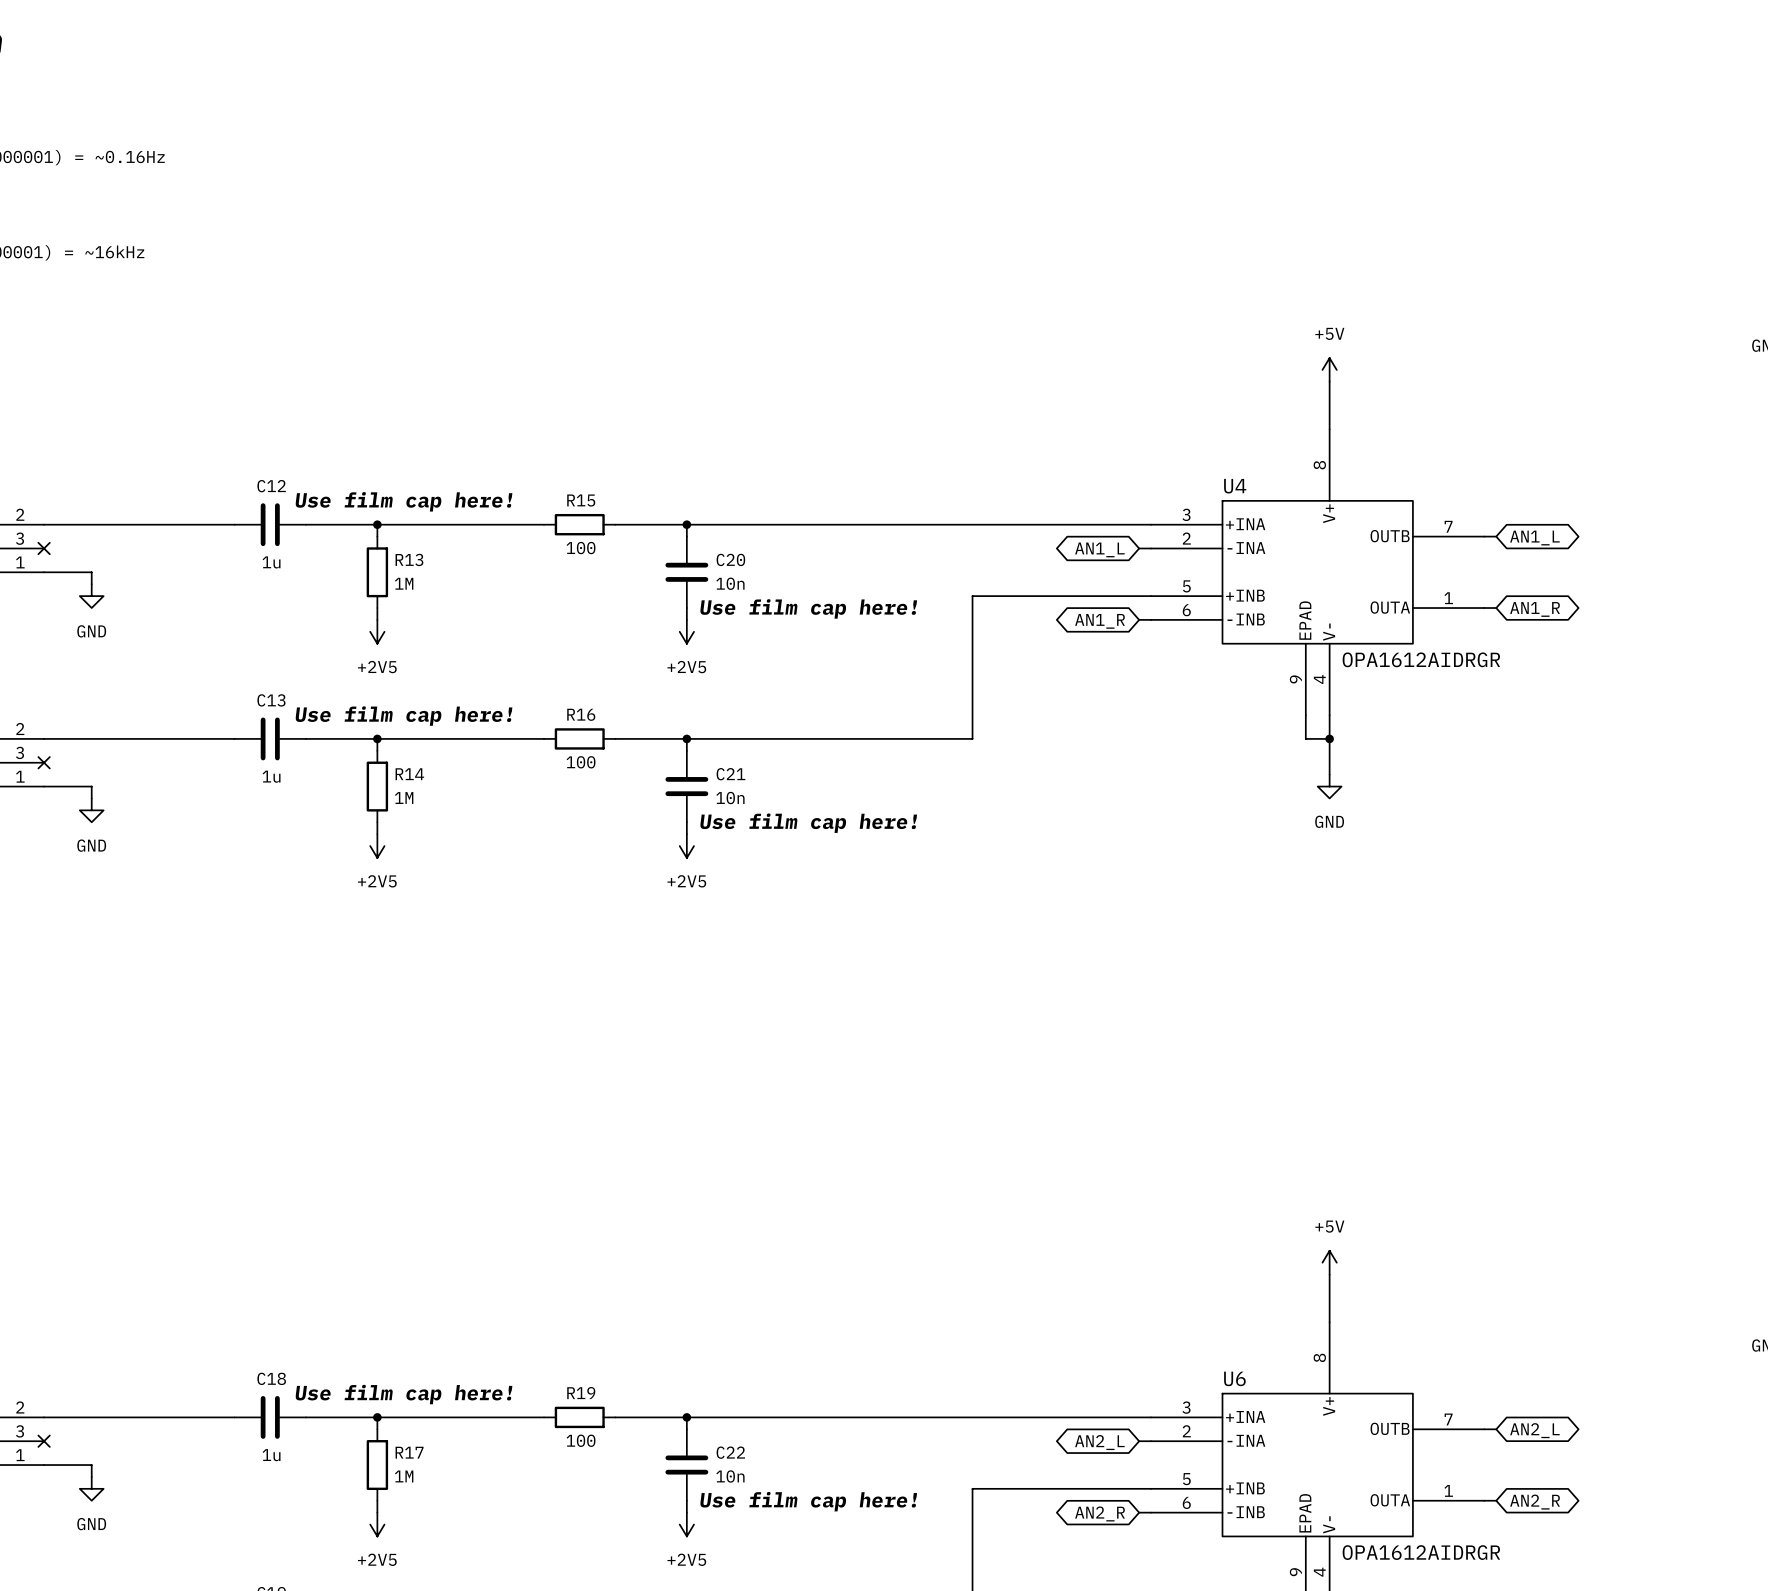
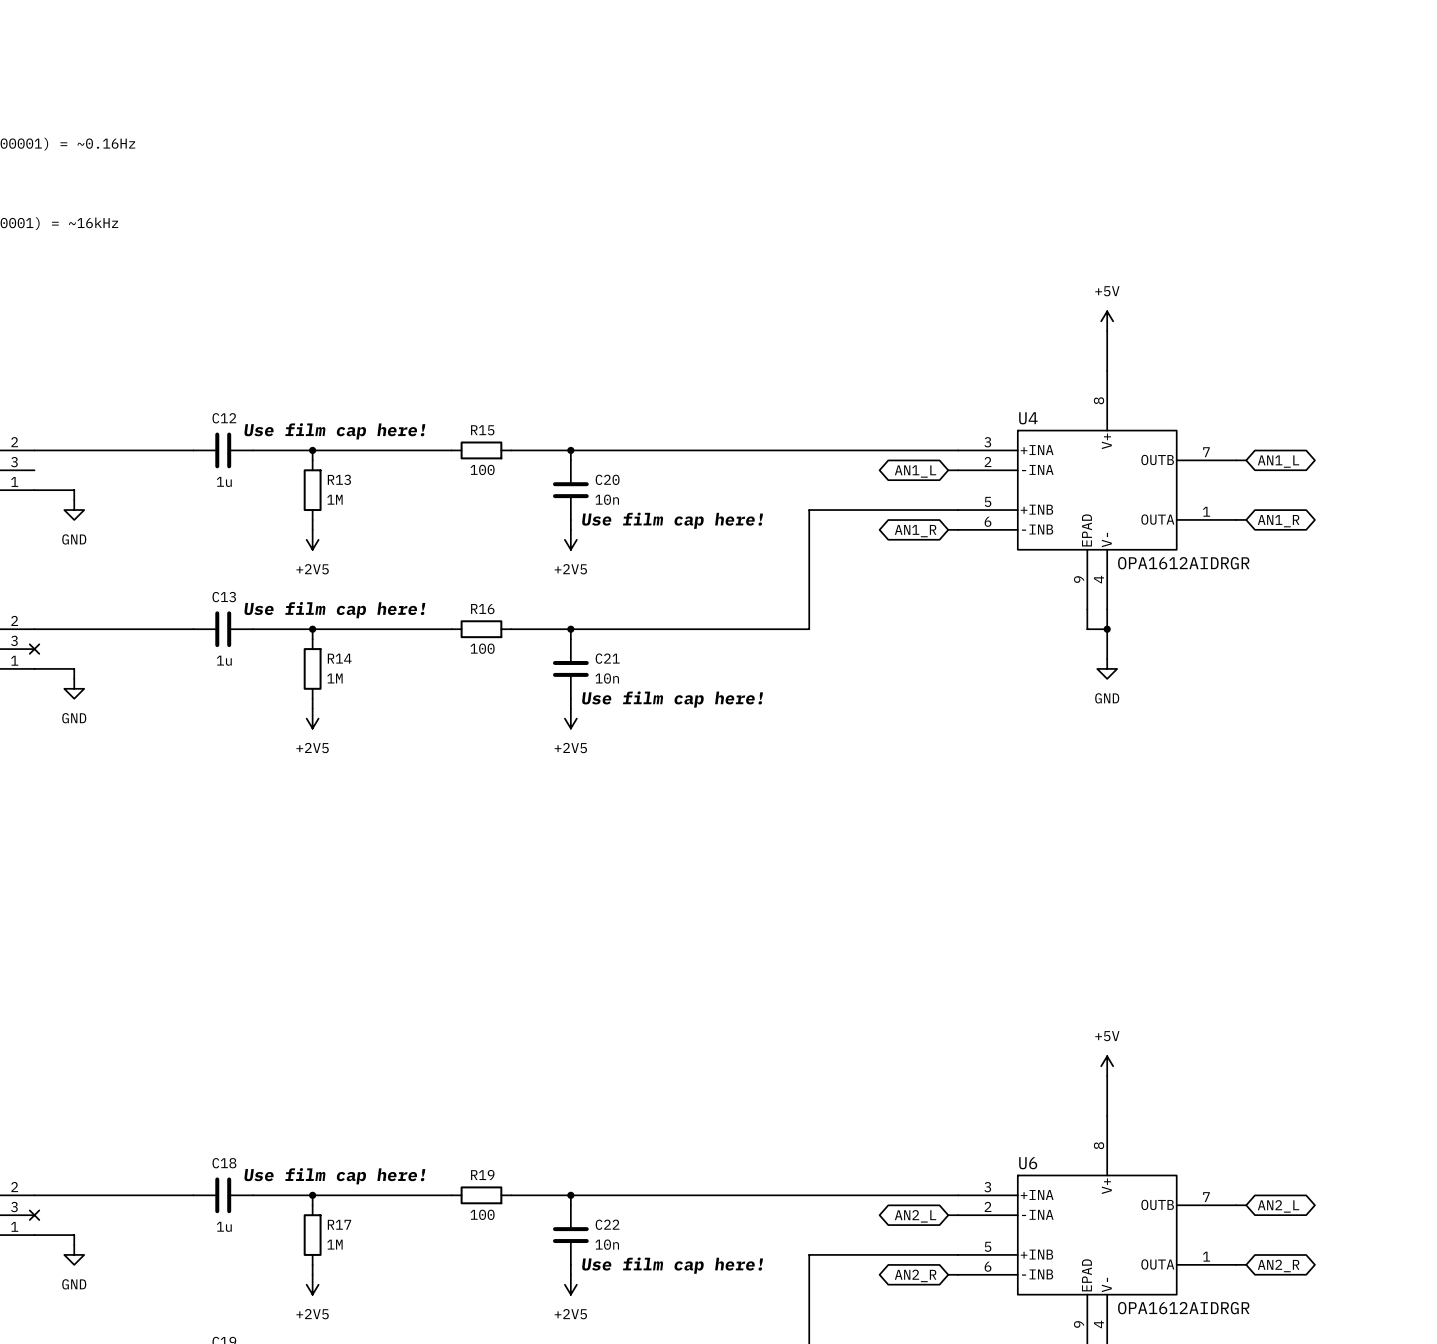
no-connect mark: (44, 548) -> none

